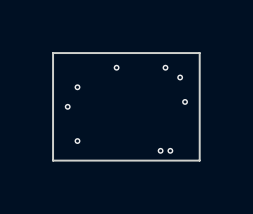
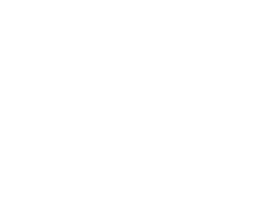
board edge: (199, 53) (53, 53) (53, 160) (199, 160) (199, 53) -> none
via: (116, 67) -> none
via: (165, 67) -> none
via: (180, 77) -> none
via: (77, 87) -> none
via: (185, 101) -> none
via: (67, 106) -> none
via: (77, 141) -> none
via: (160, 150) -> none
via: (170, 150) -> none

